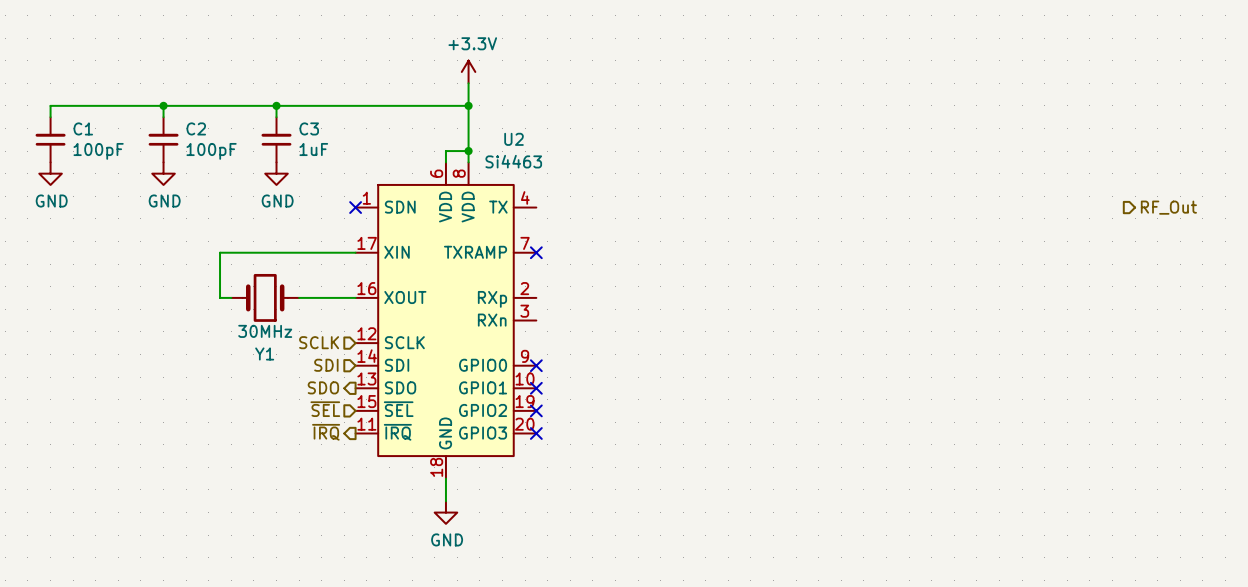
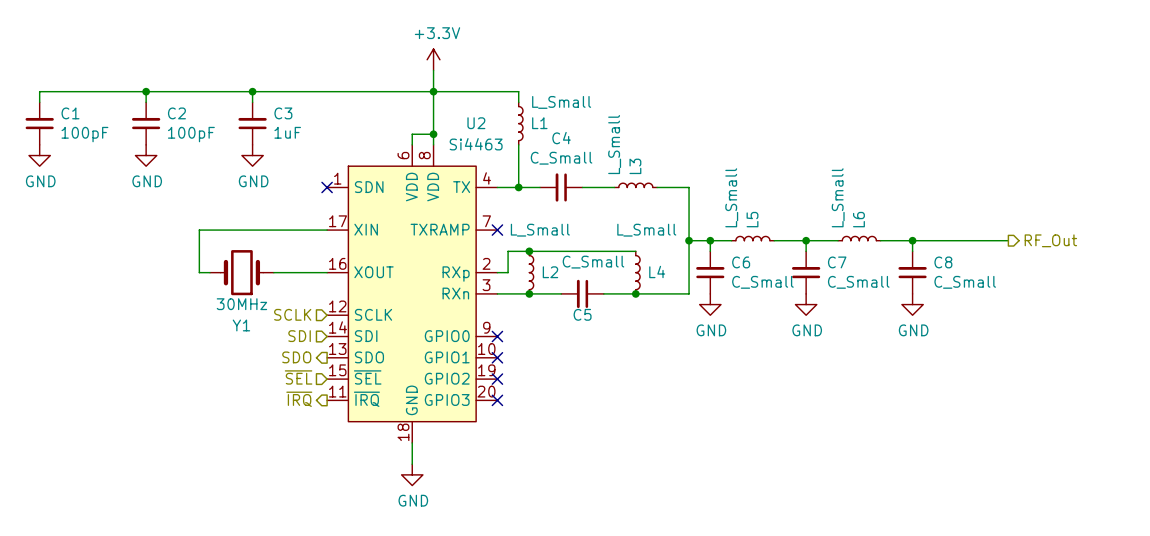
wire: none -> (433, 91) (518, 91) (518, 102)
L1: none -> L_Small (520, 123)
wire: none -> (518, 144) (518, 187)
L3: none -> L_Small (635, 185)
wire: none -> (497, 187) (540, 187)
junction: none -> (518, 187)
C4: none -> C_Small (561, 187)
wire: none -> (582, 187) (614, 187)
wire: none -> (657, 187) (689, 187) (689, 293) (603, 293)
hierarchical label position: RF_Out (1168, 207) -> RF_Out (1050, 240)
L5: none -> L_Small (752, 238)
L6: none -> L_Small (859, 238)
wire: none -> (689, 240) (731, 240)
junction: none -> (689, 240)
wire: none -> (710, 240) (710, 251)
junction: none -> (710, 240)
wire: none -> (774, 240) (838, 240)
wire: none -> (806, 240) (806, 251)
junction: none -> (806, 240)
wire: none -> (880, 240) (1008, 240)
wire: none -> (912, 240) (912, 251)
junction: none -> (912, 240)
junction: none -> (529, 251)
wire: none -> (635, 251) (508, 251) (508, 272) (497, 272)
L2: none -> L_Small (531, 272)
L4: none -> L_Small (637, 272)
C6: none -> C_Small (710, 272)
C7: none -> C_Small (806, 272)
C8: none -> C_Small (912, 272)
wire: none -> (497, 293) (561, 293)
junction: none -> (529, 293)
C5: none -> C_Small (582, 293)
junction: none -> (635, 293)
power symbol: none -> GND (710, 304)
power symbol: none -> GND (806, 304)
power symbol: none -> GND (912, 304)

